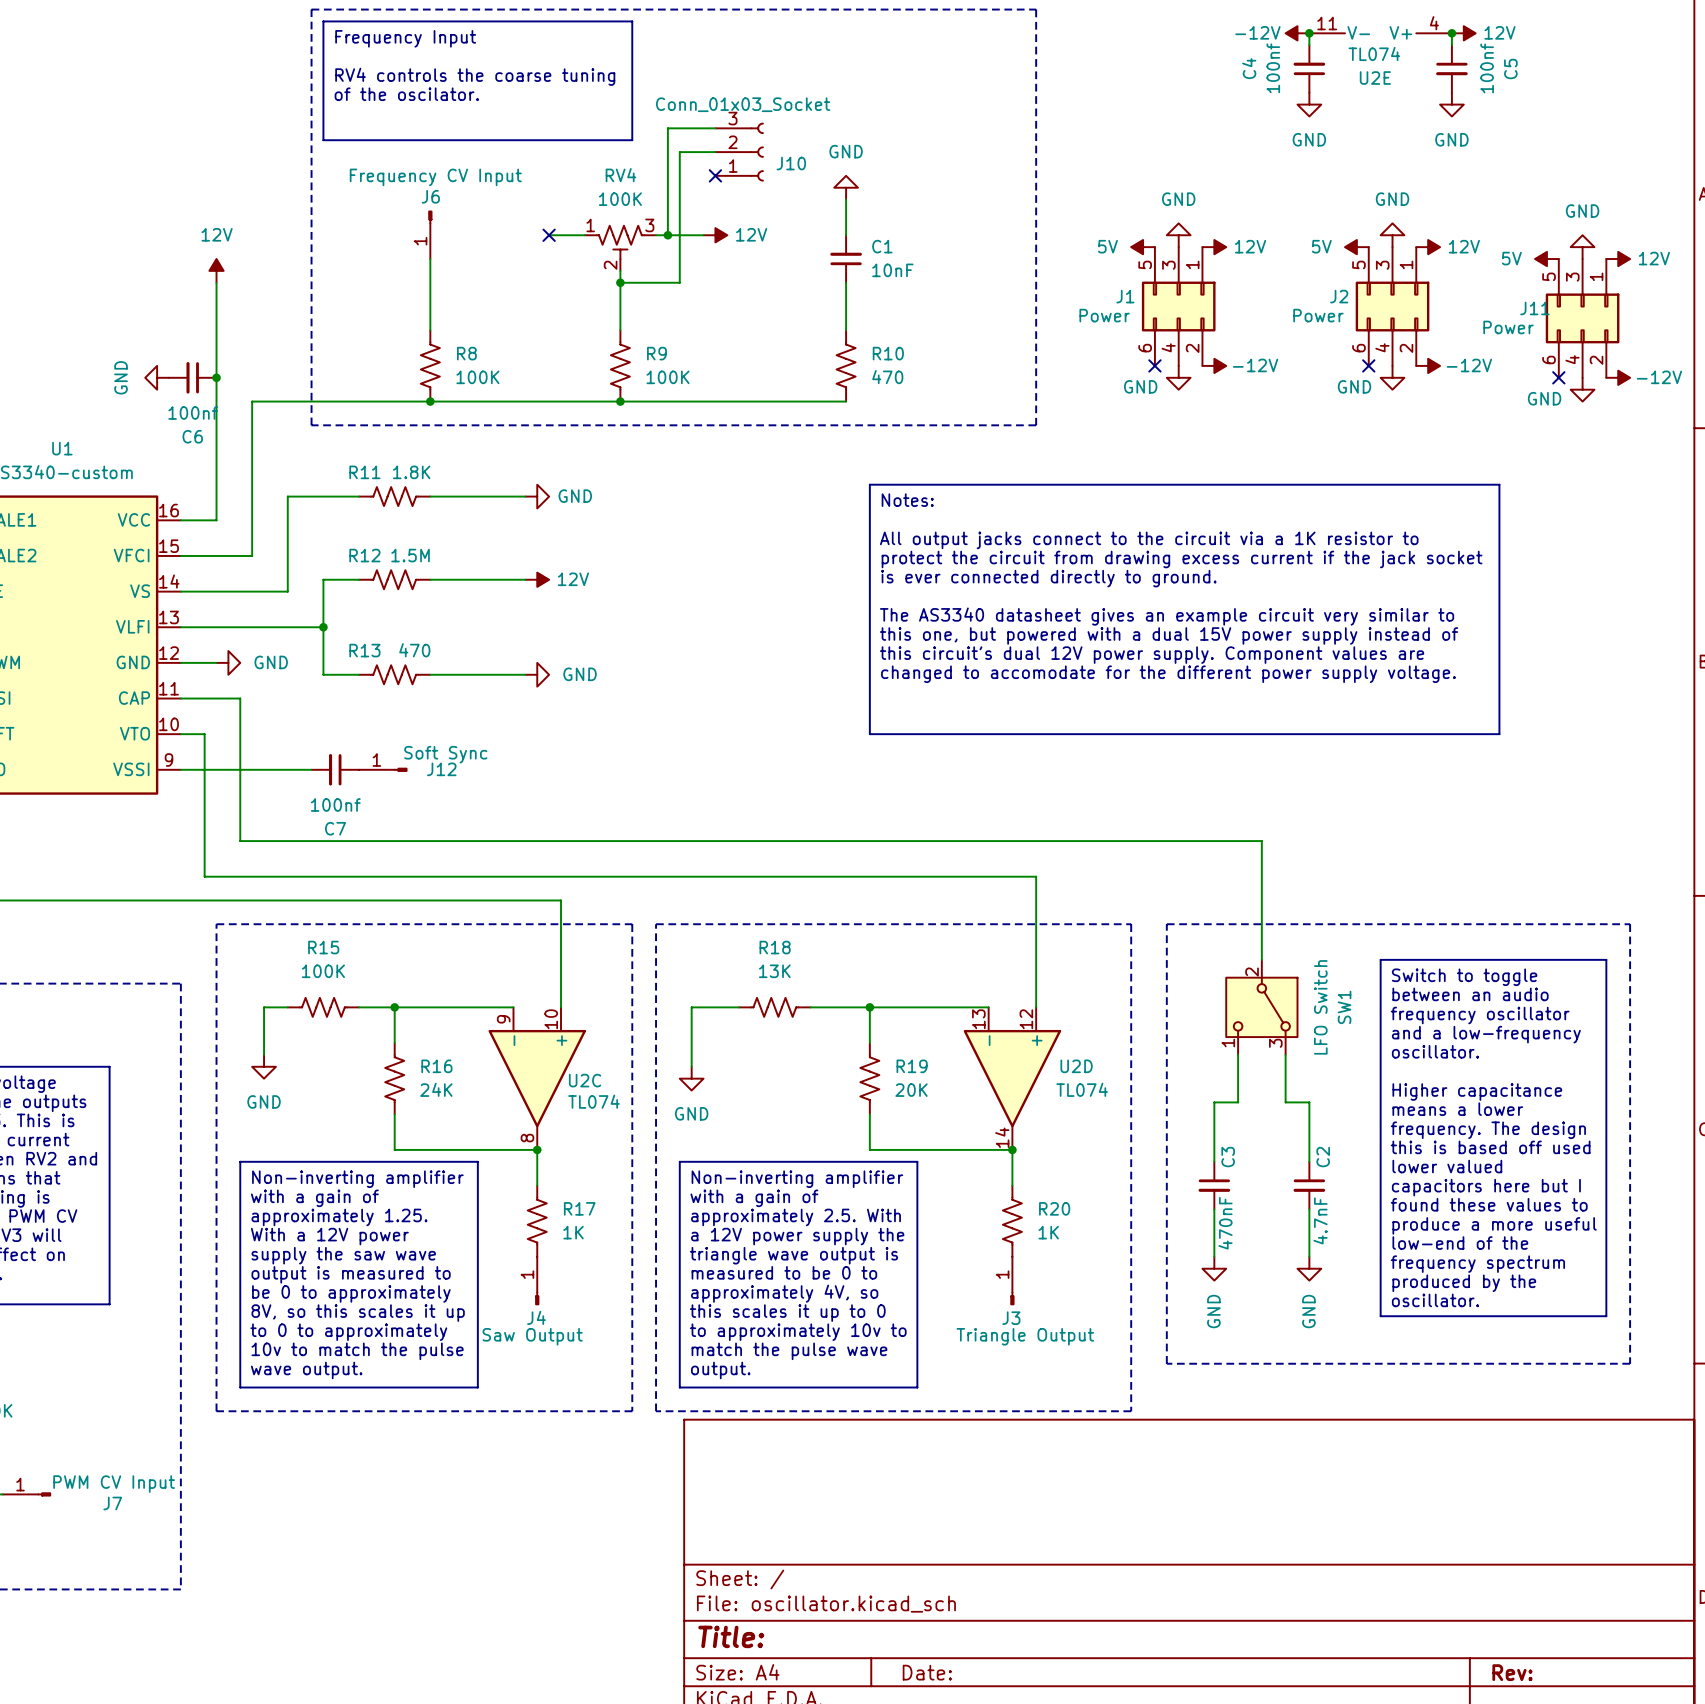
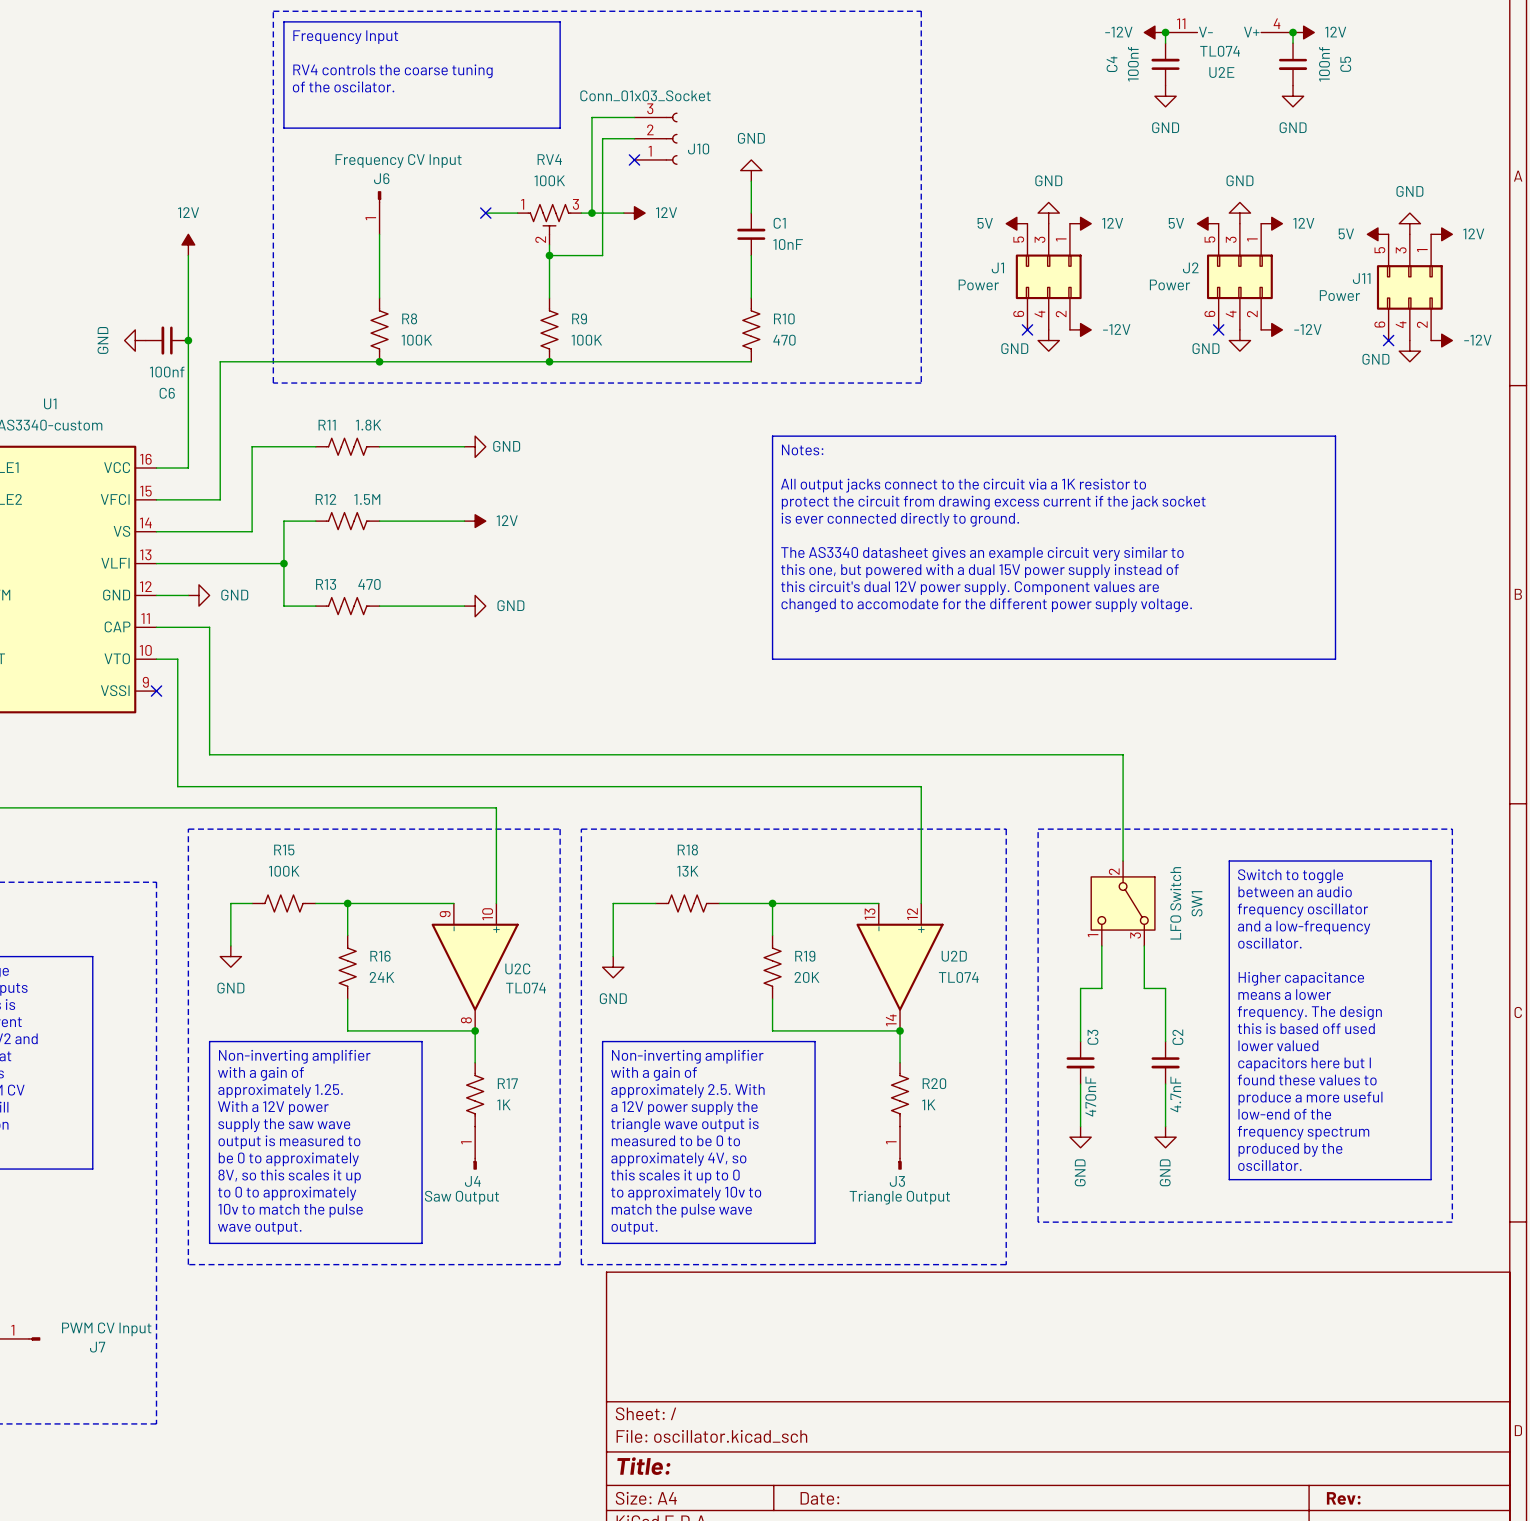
wire: (180, 769) (311, 769) -> none
no-connect mark: none -> (156, 691)
C7: 100nf (335, 769) -> none
J12: Soft Sync (383, 769) -> none

